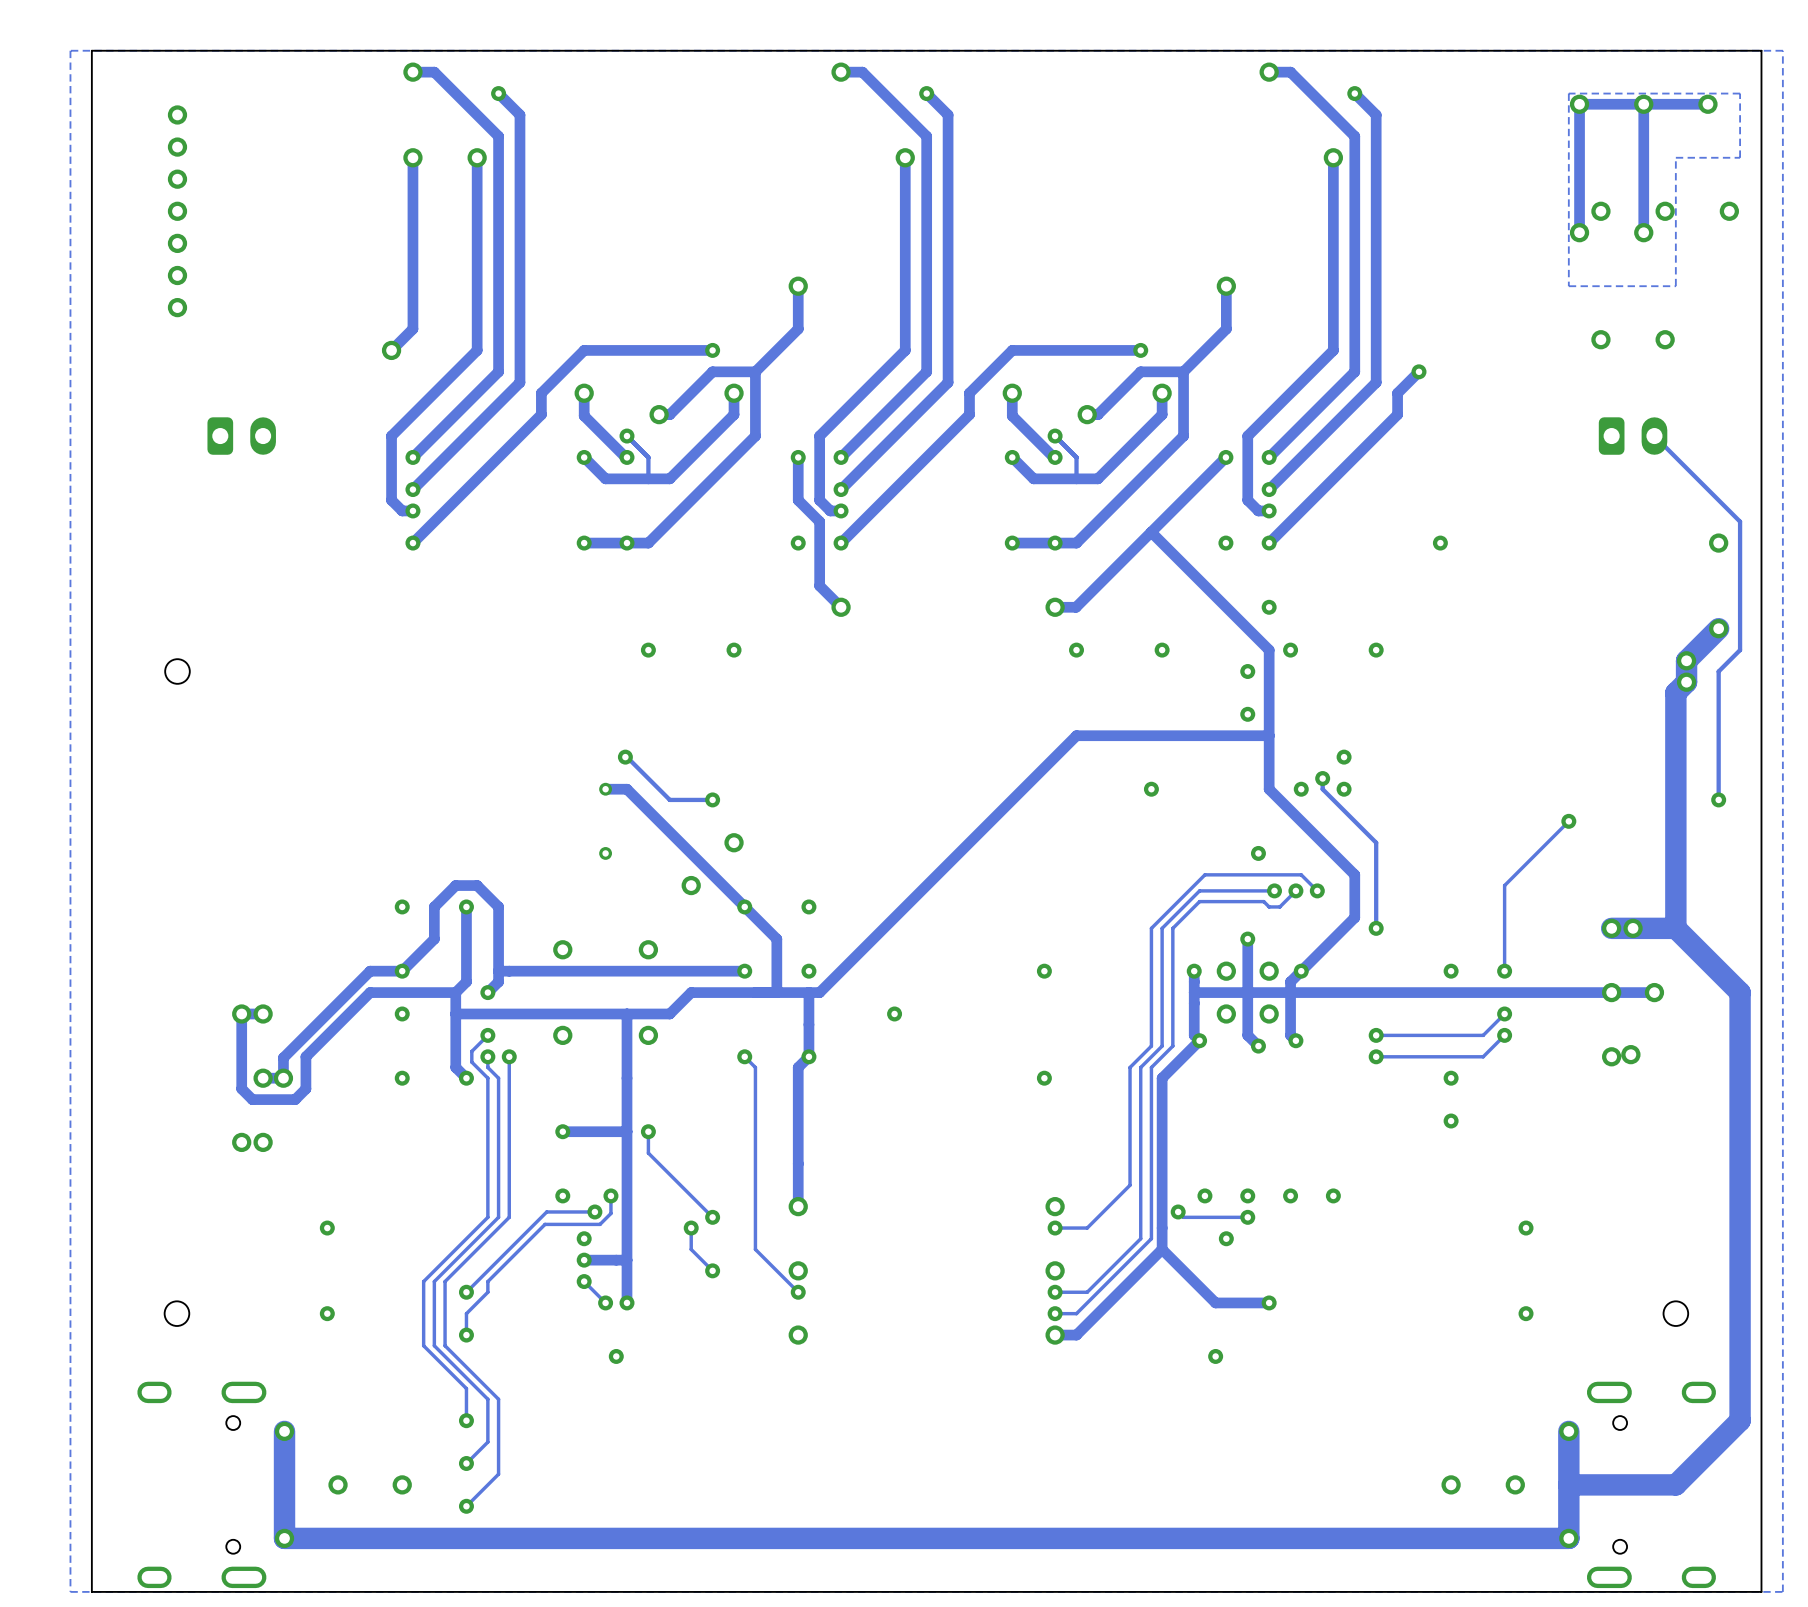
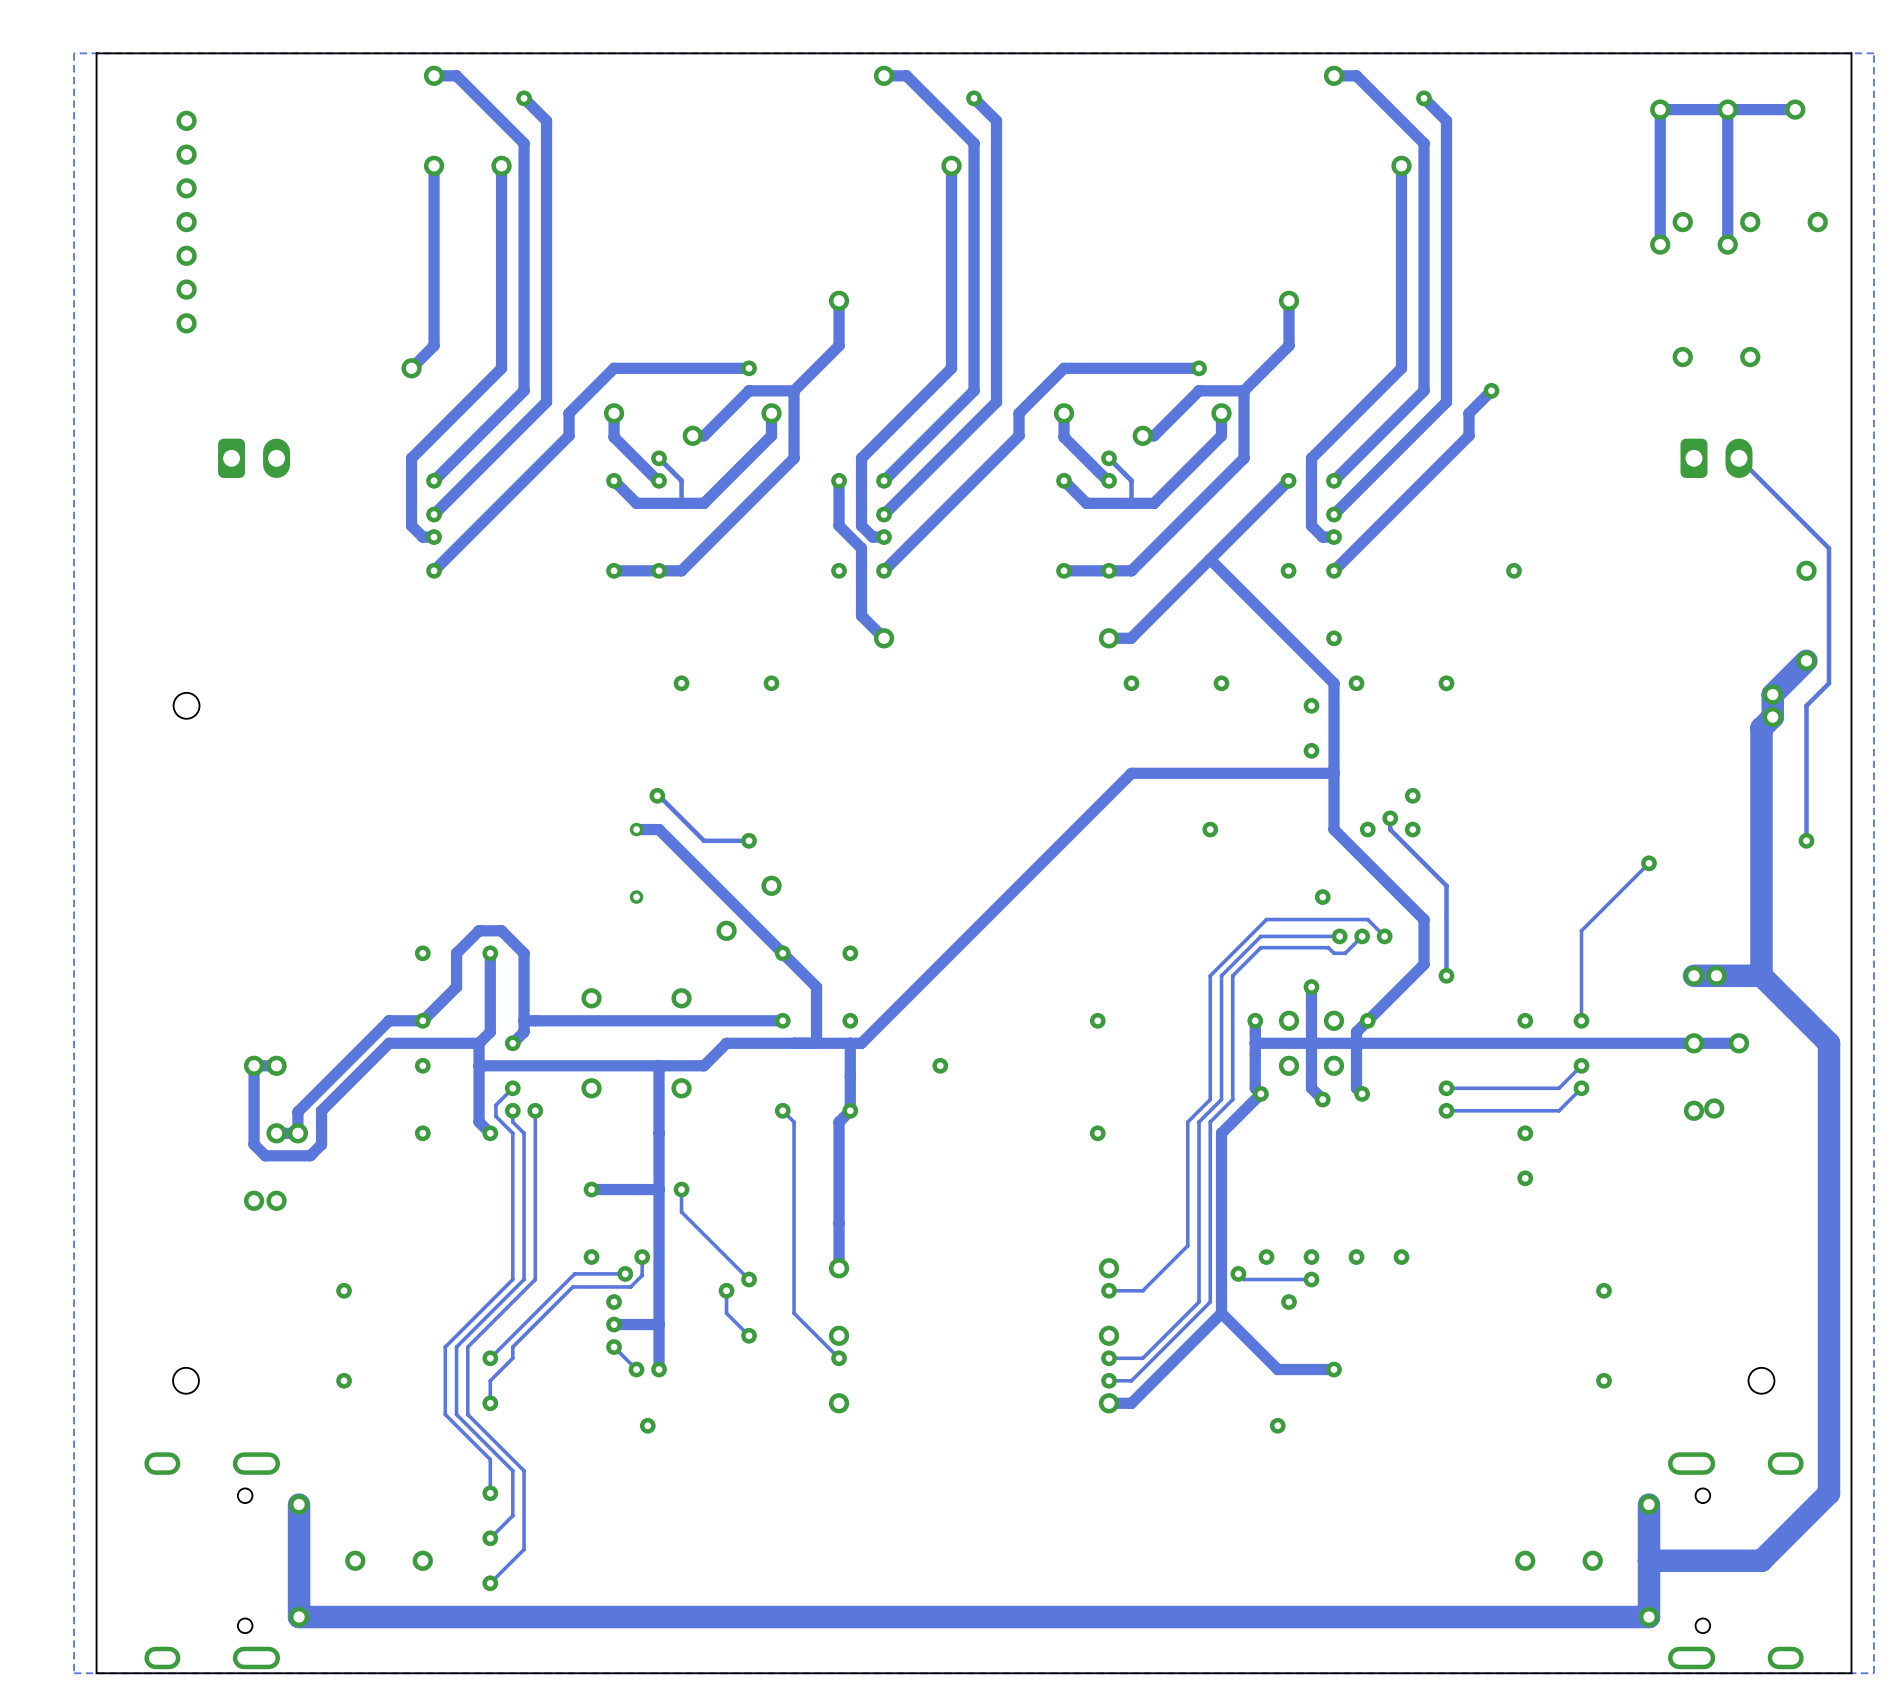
zone outline: (1740, 93) (1740, 157) (1675, 157) (1675, 286) (1568, 286) (1568, 93) (1740, 93) -> none

